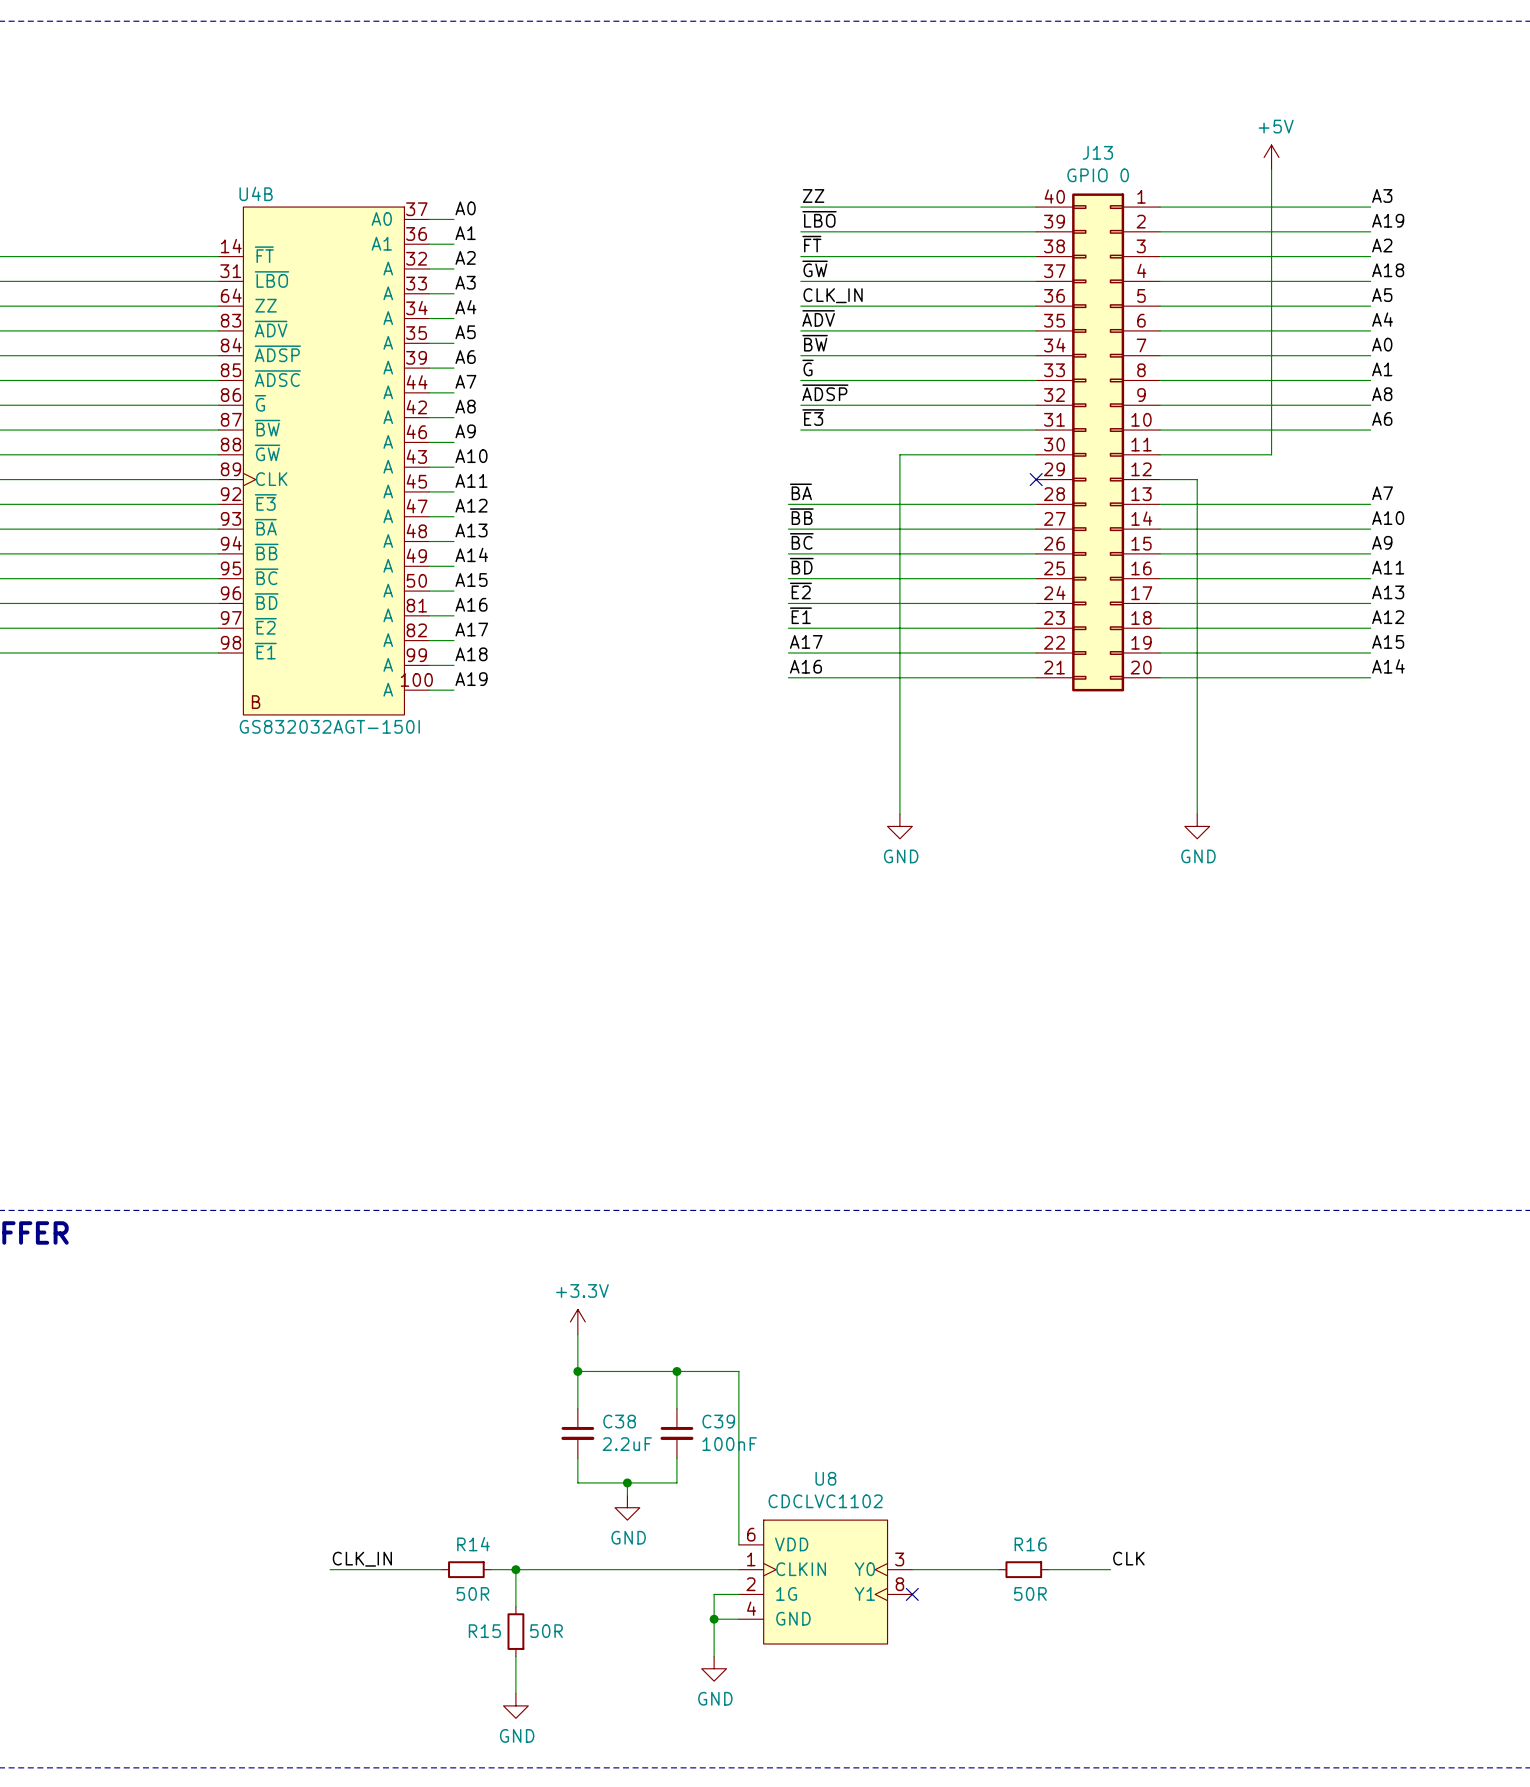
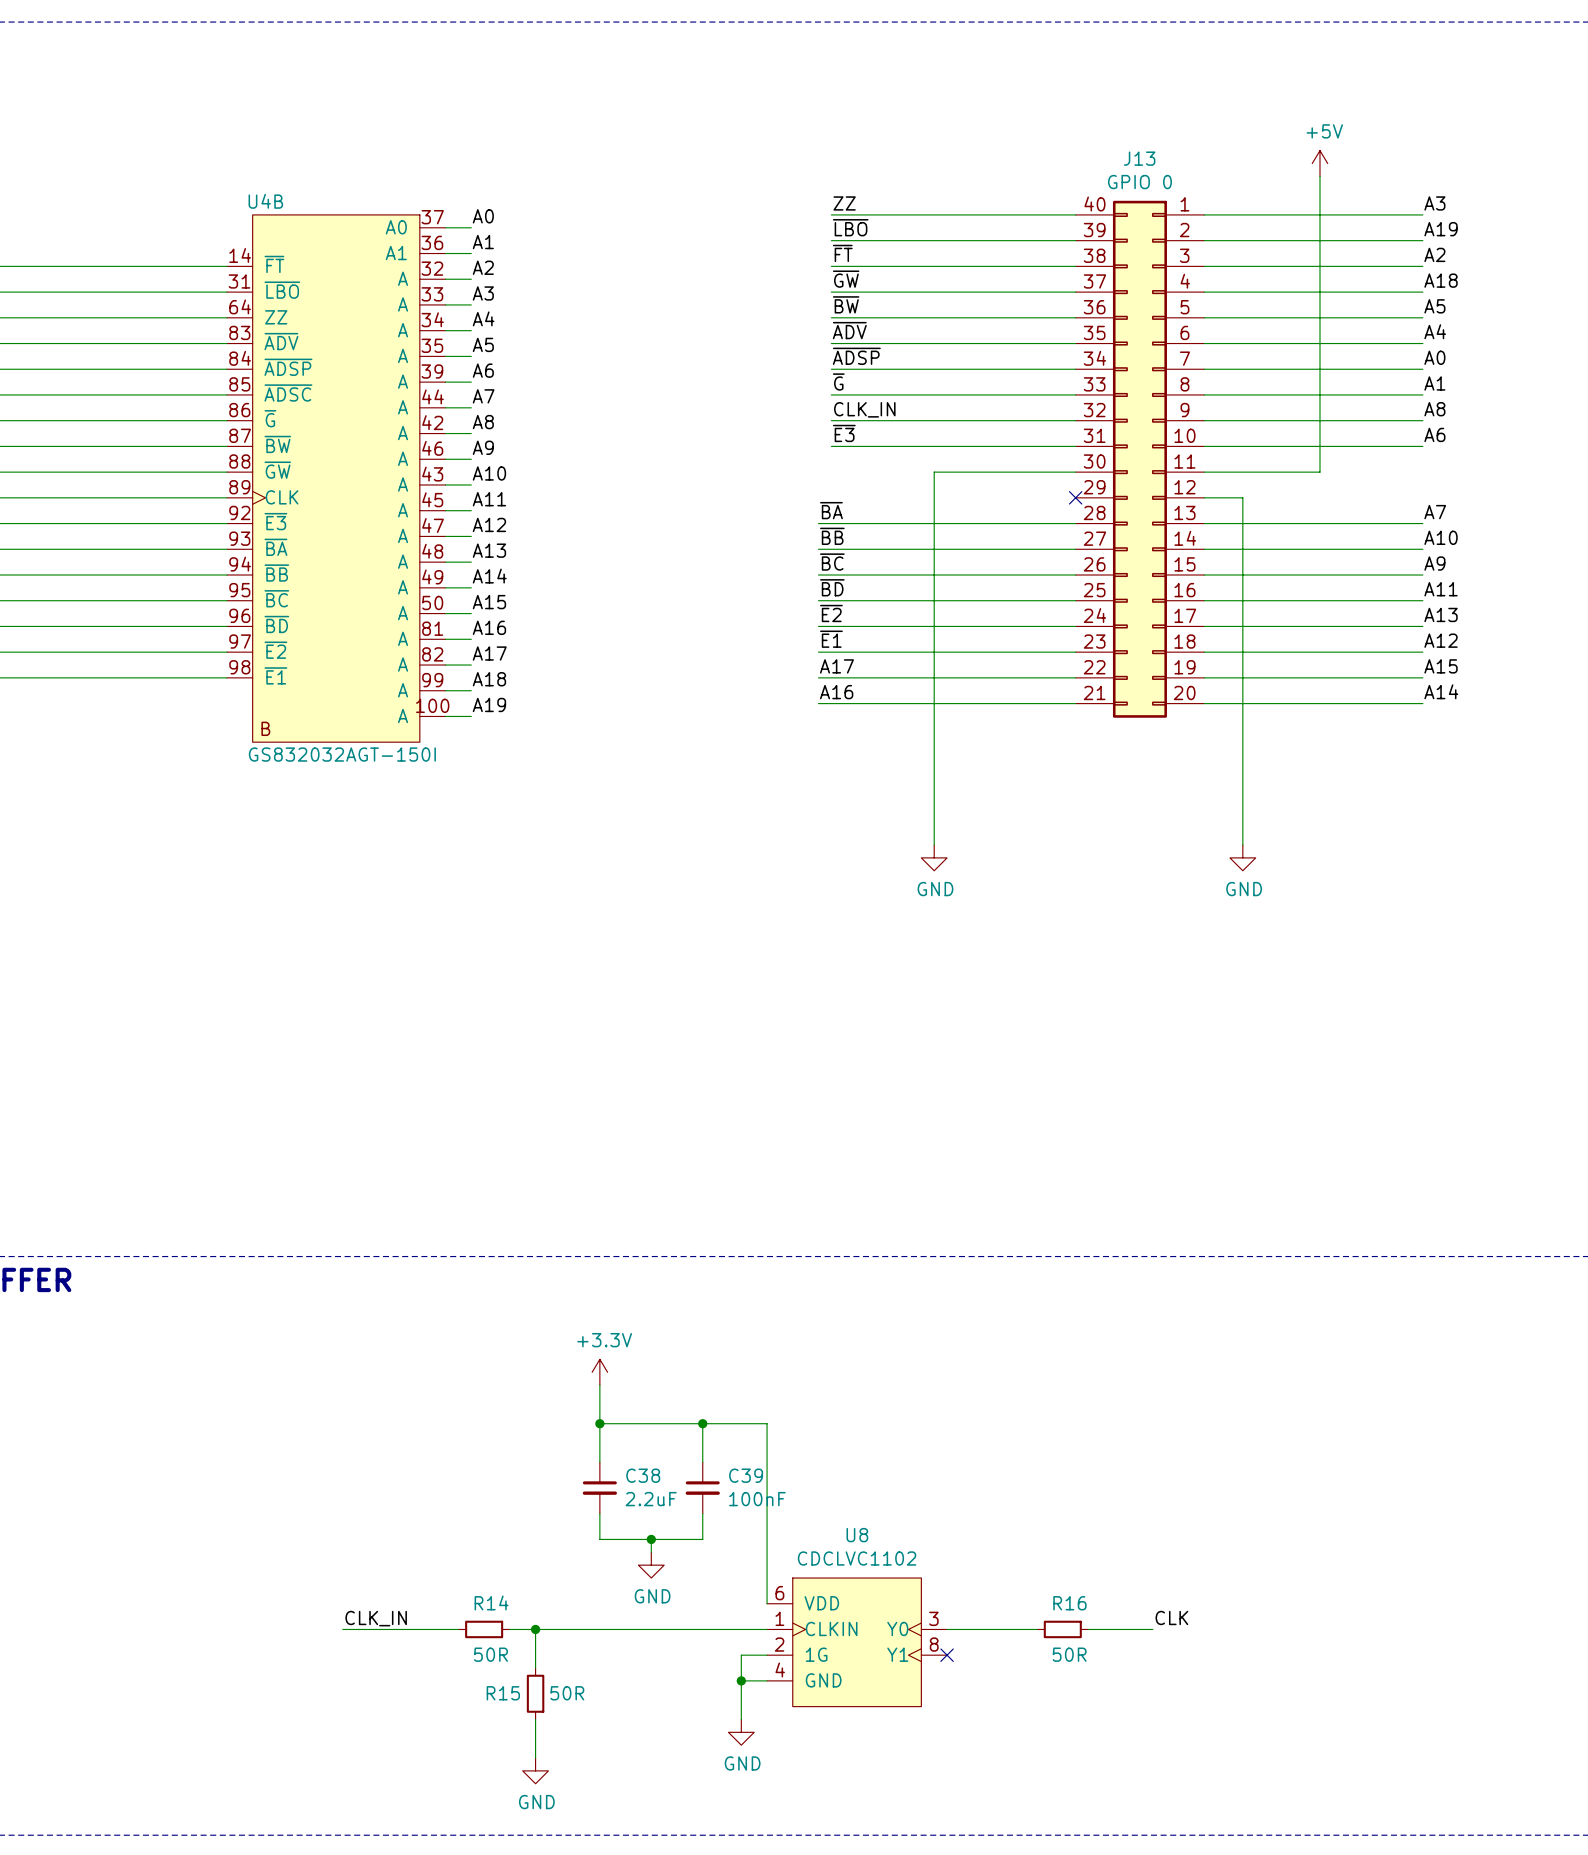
label: CLK_IN (833, 295) -> ~{BW} (846, 304)
label: ~{BW} (815, 343) -> ~{ADSP} (856, 356)
label: ~{ADSP} (825, 392) -> CLK_IN (864, 409)

